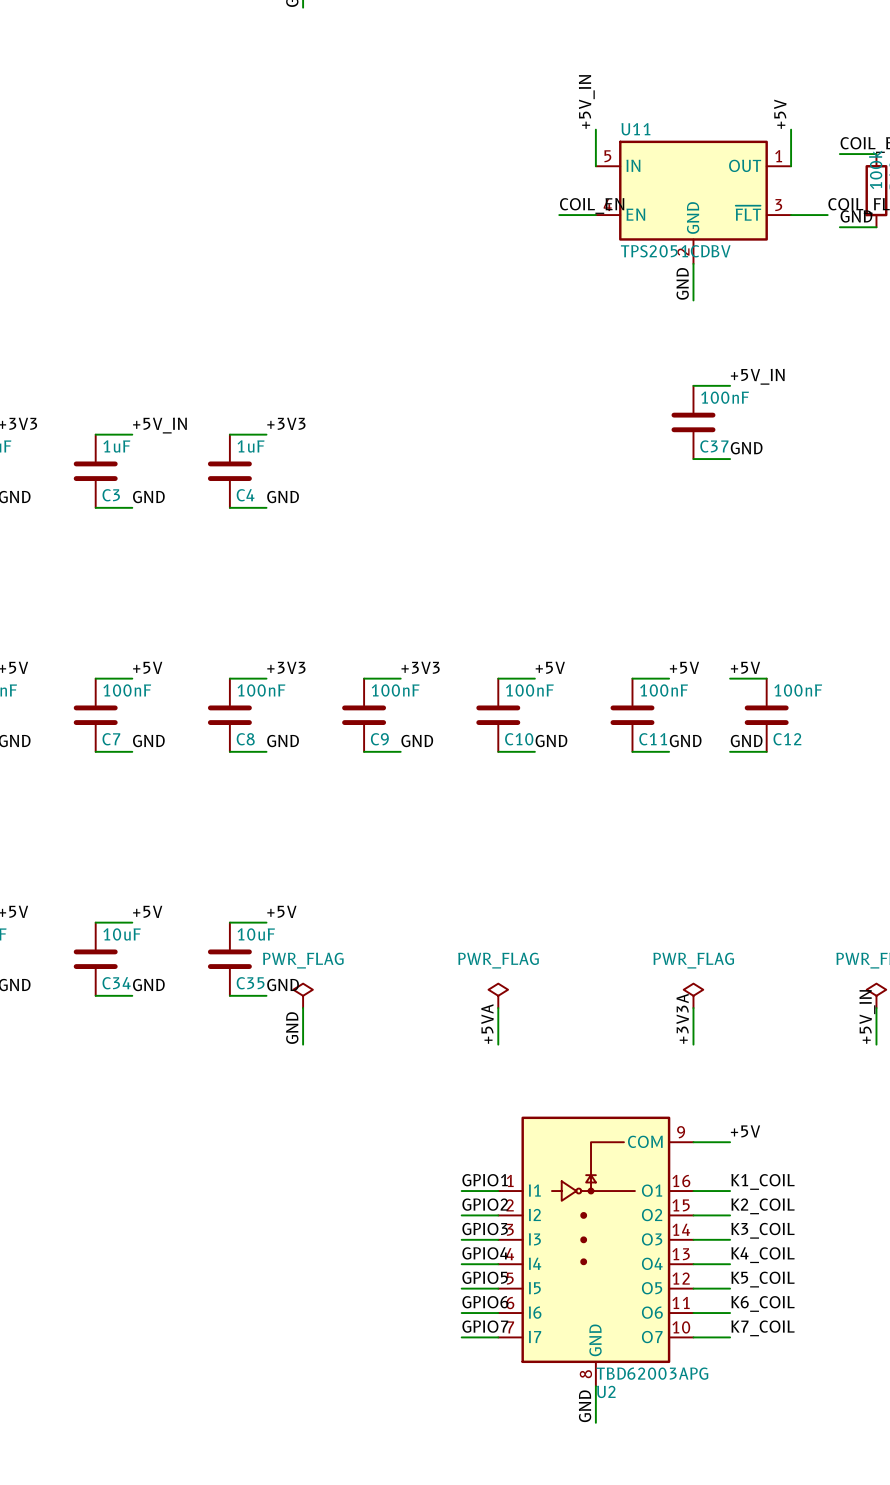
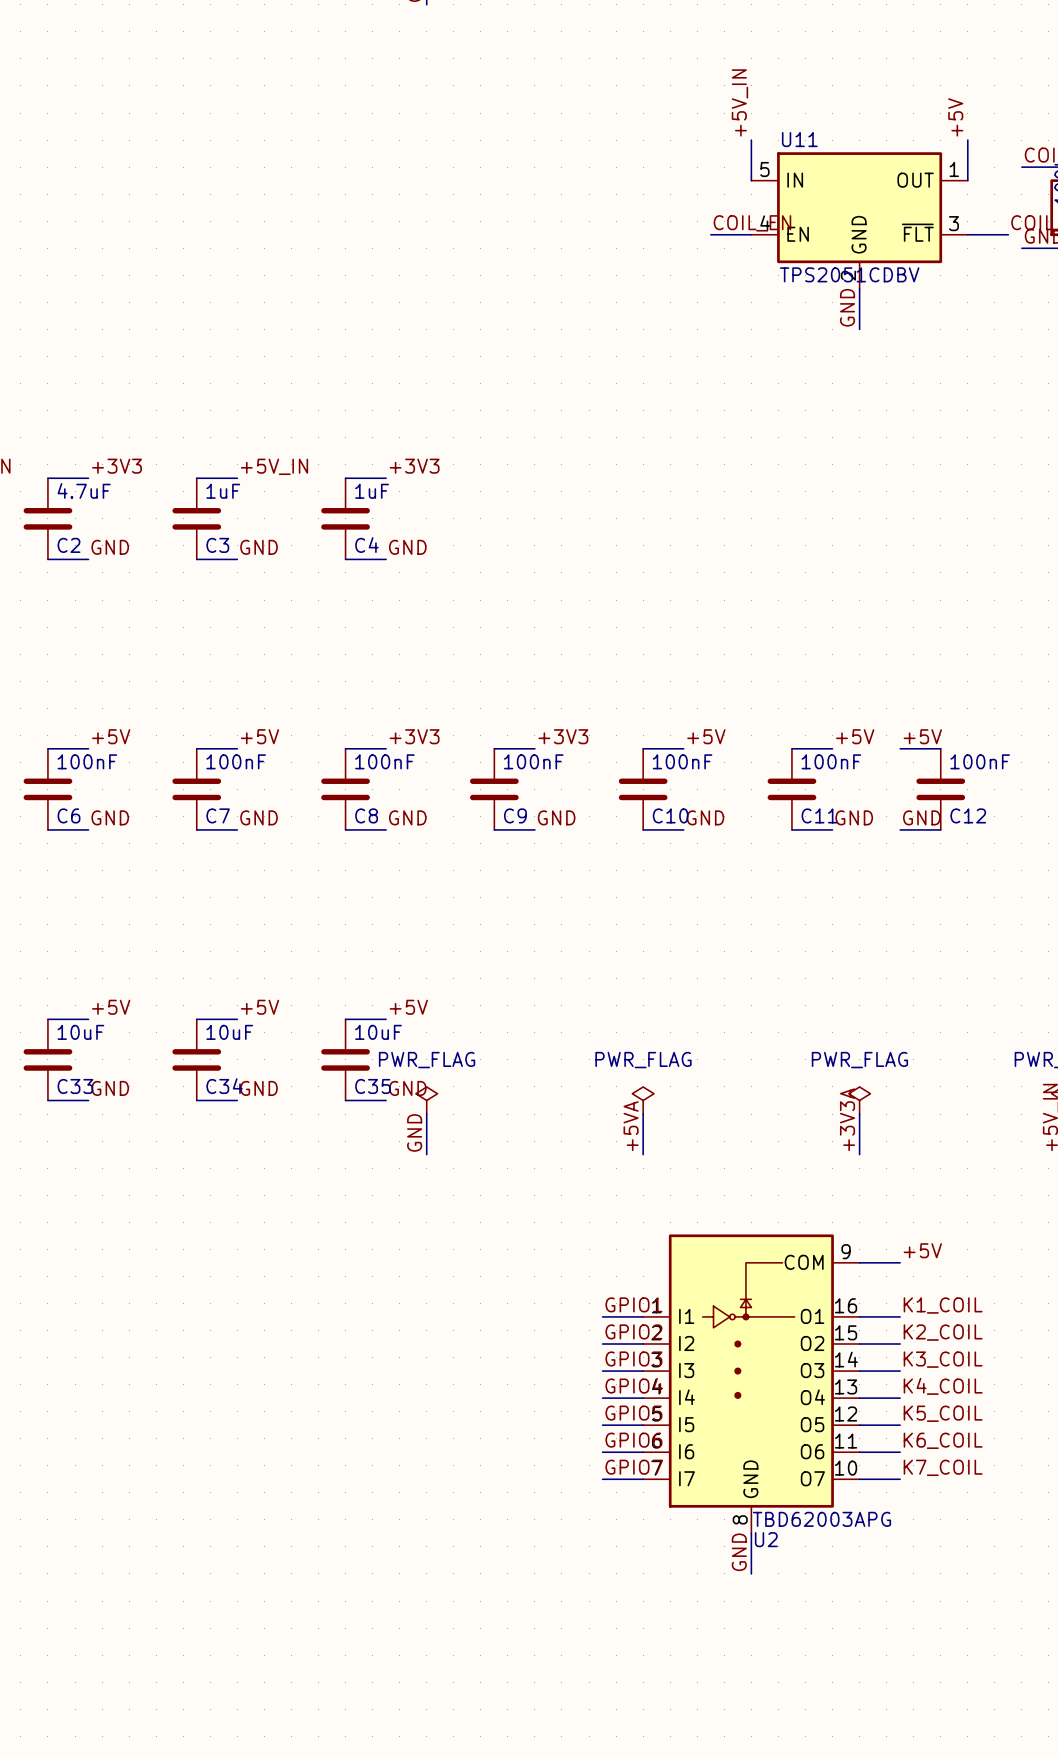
label: +5V_IN (757, 376) -> none
wire: (693, 385) (730, 385) -> none
C37: 100nF (693, 422) -> none
label: GND (746, 448) -> none
wire: (693, 459) (730, 459) -> none

